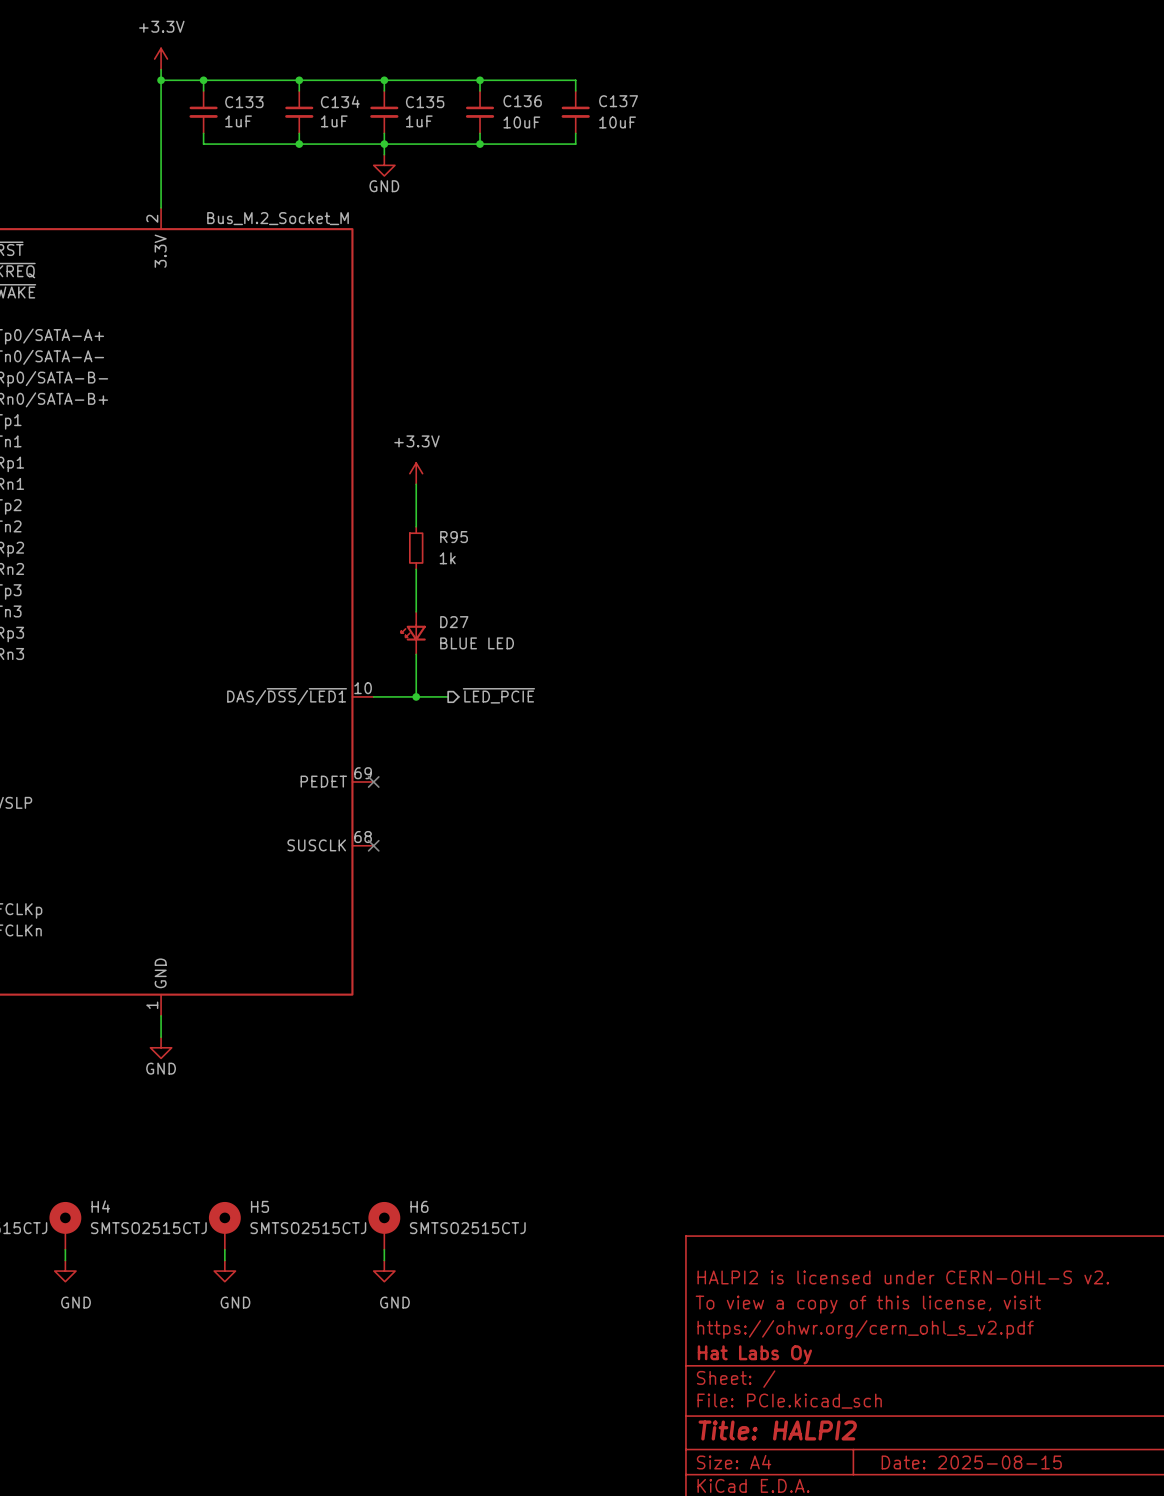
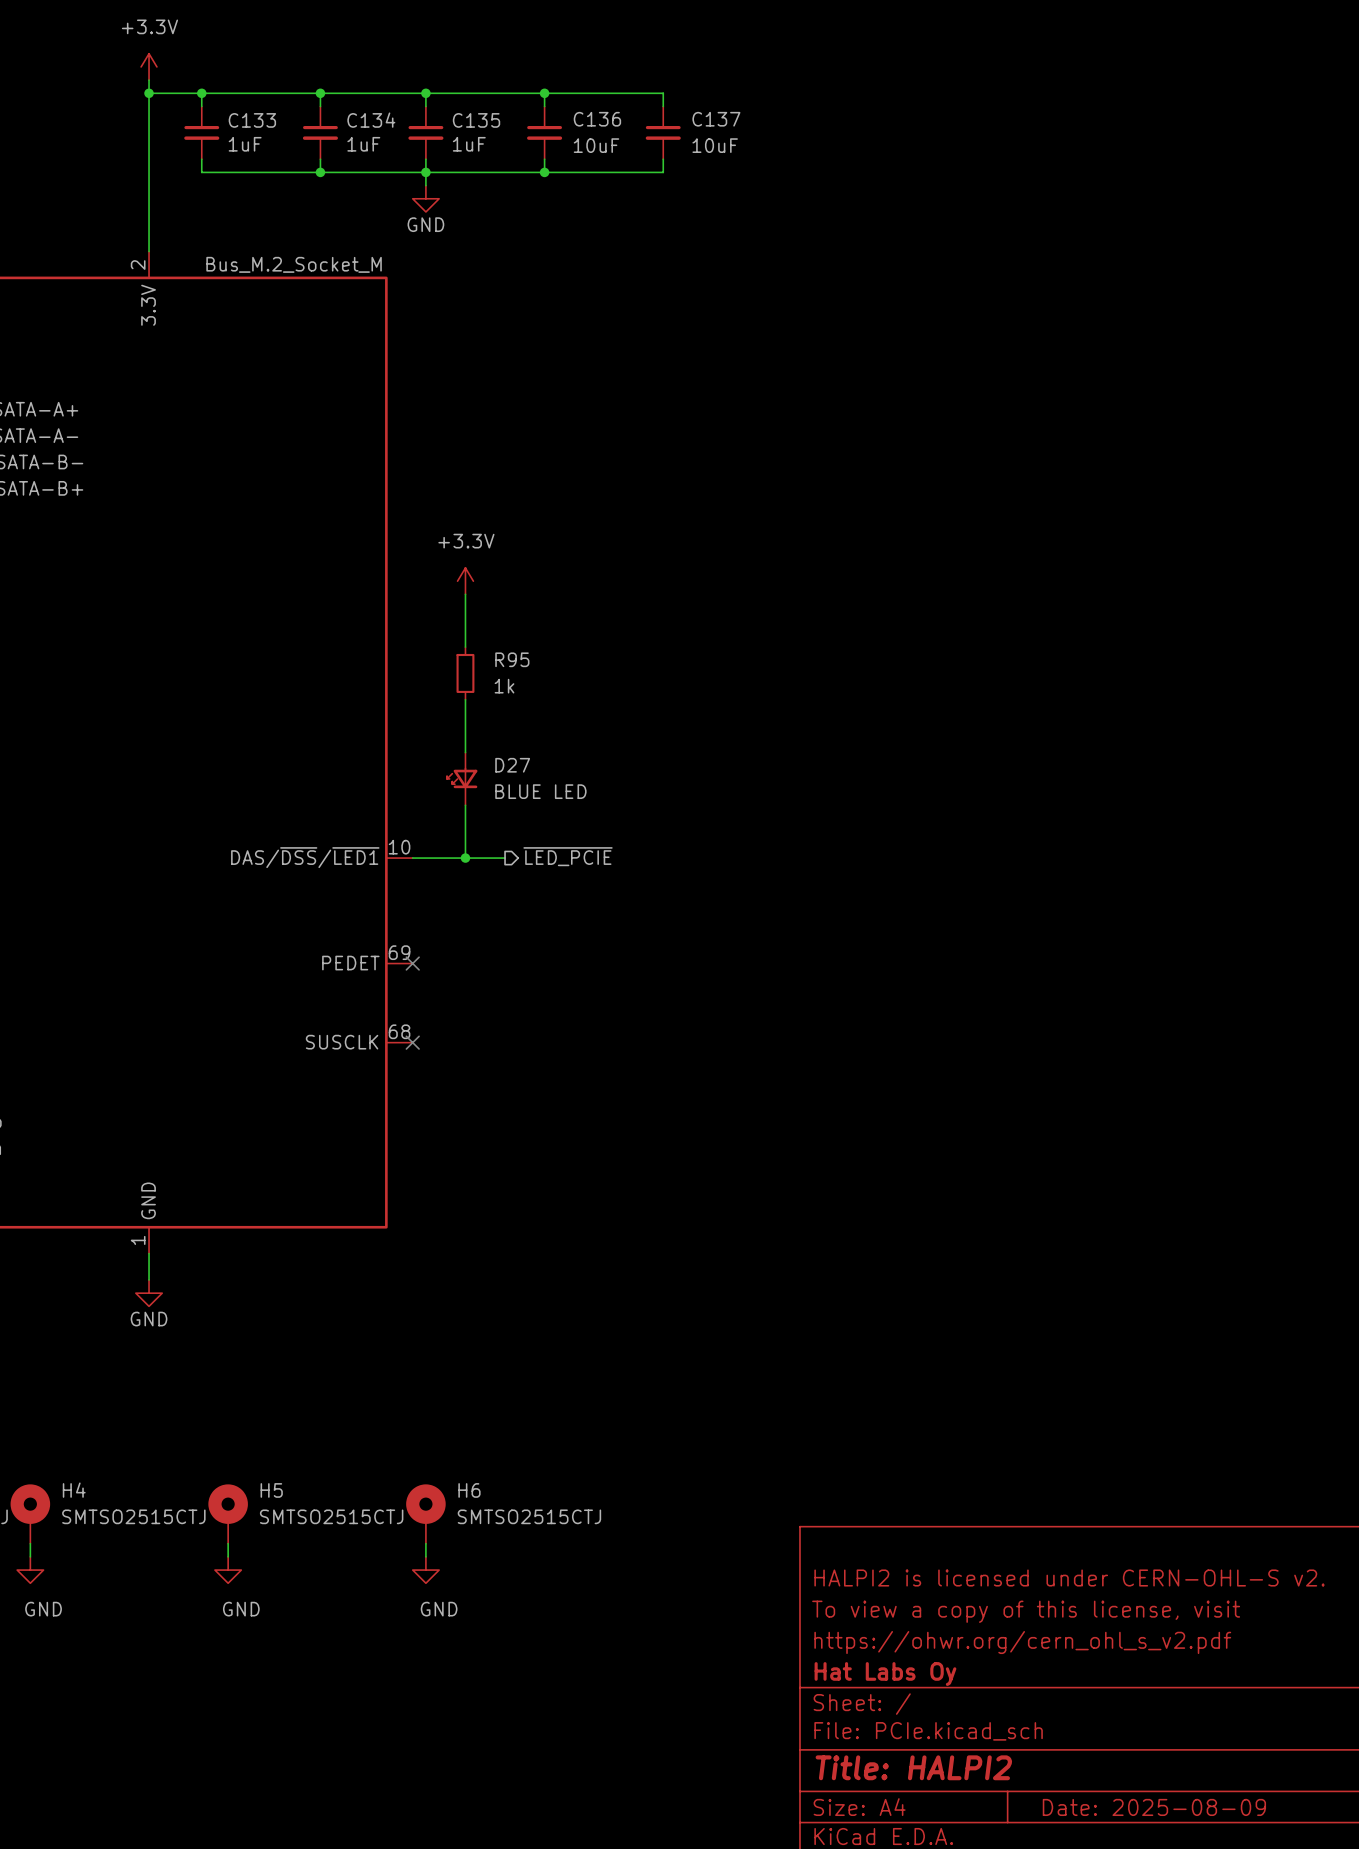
title block: Date: 2025-08-15 (971, 1462) -> Date: 2025-08-09 (1154, 1807)

